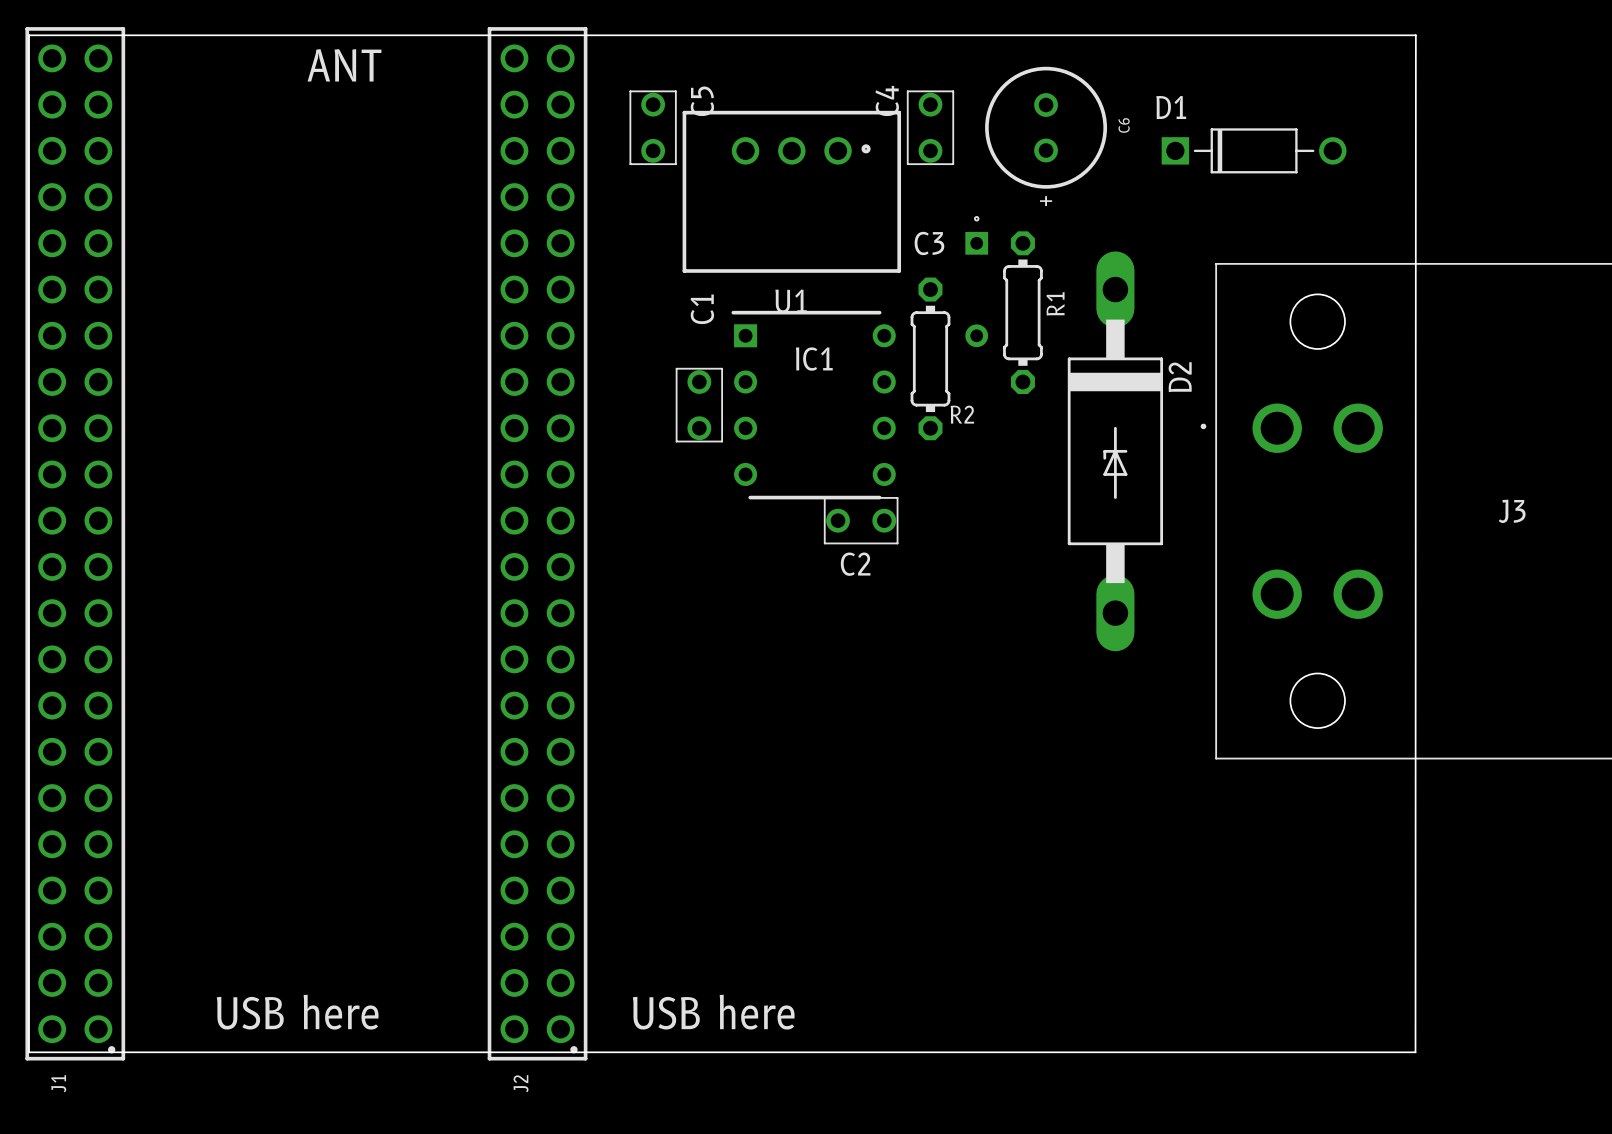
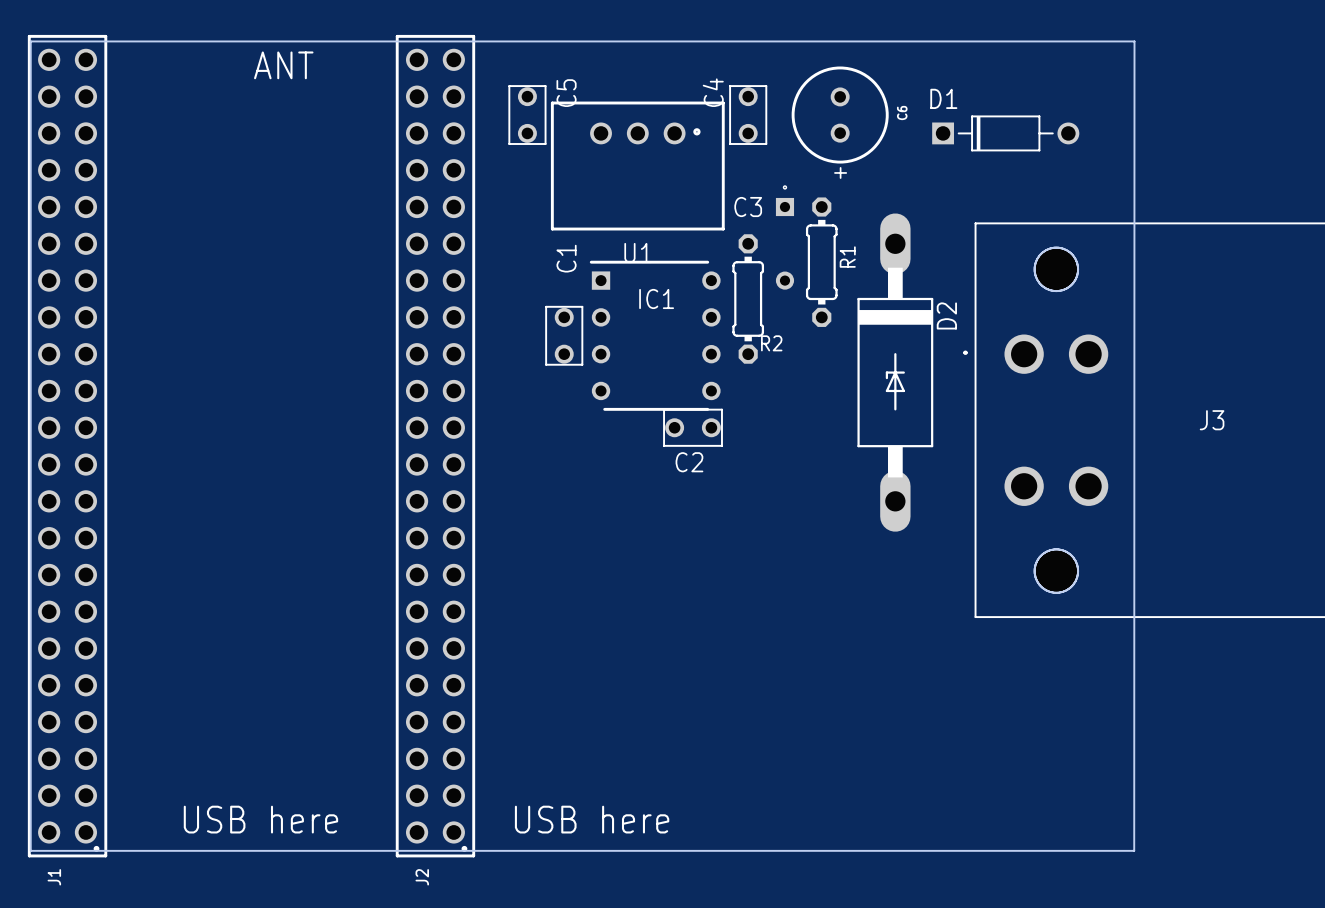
hole: none -> (1056, 269)
hole: none -> (1056, 571)

